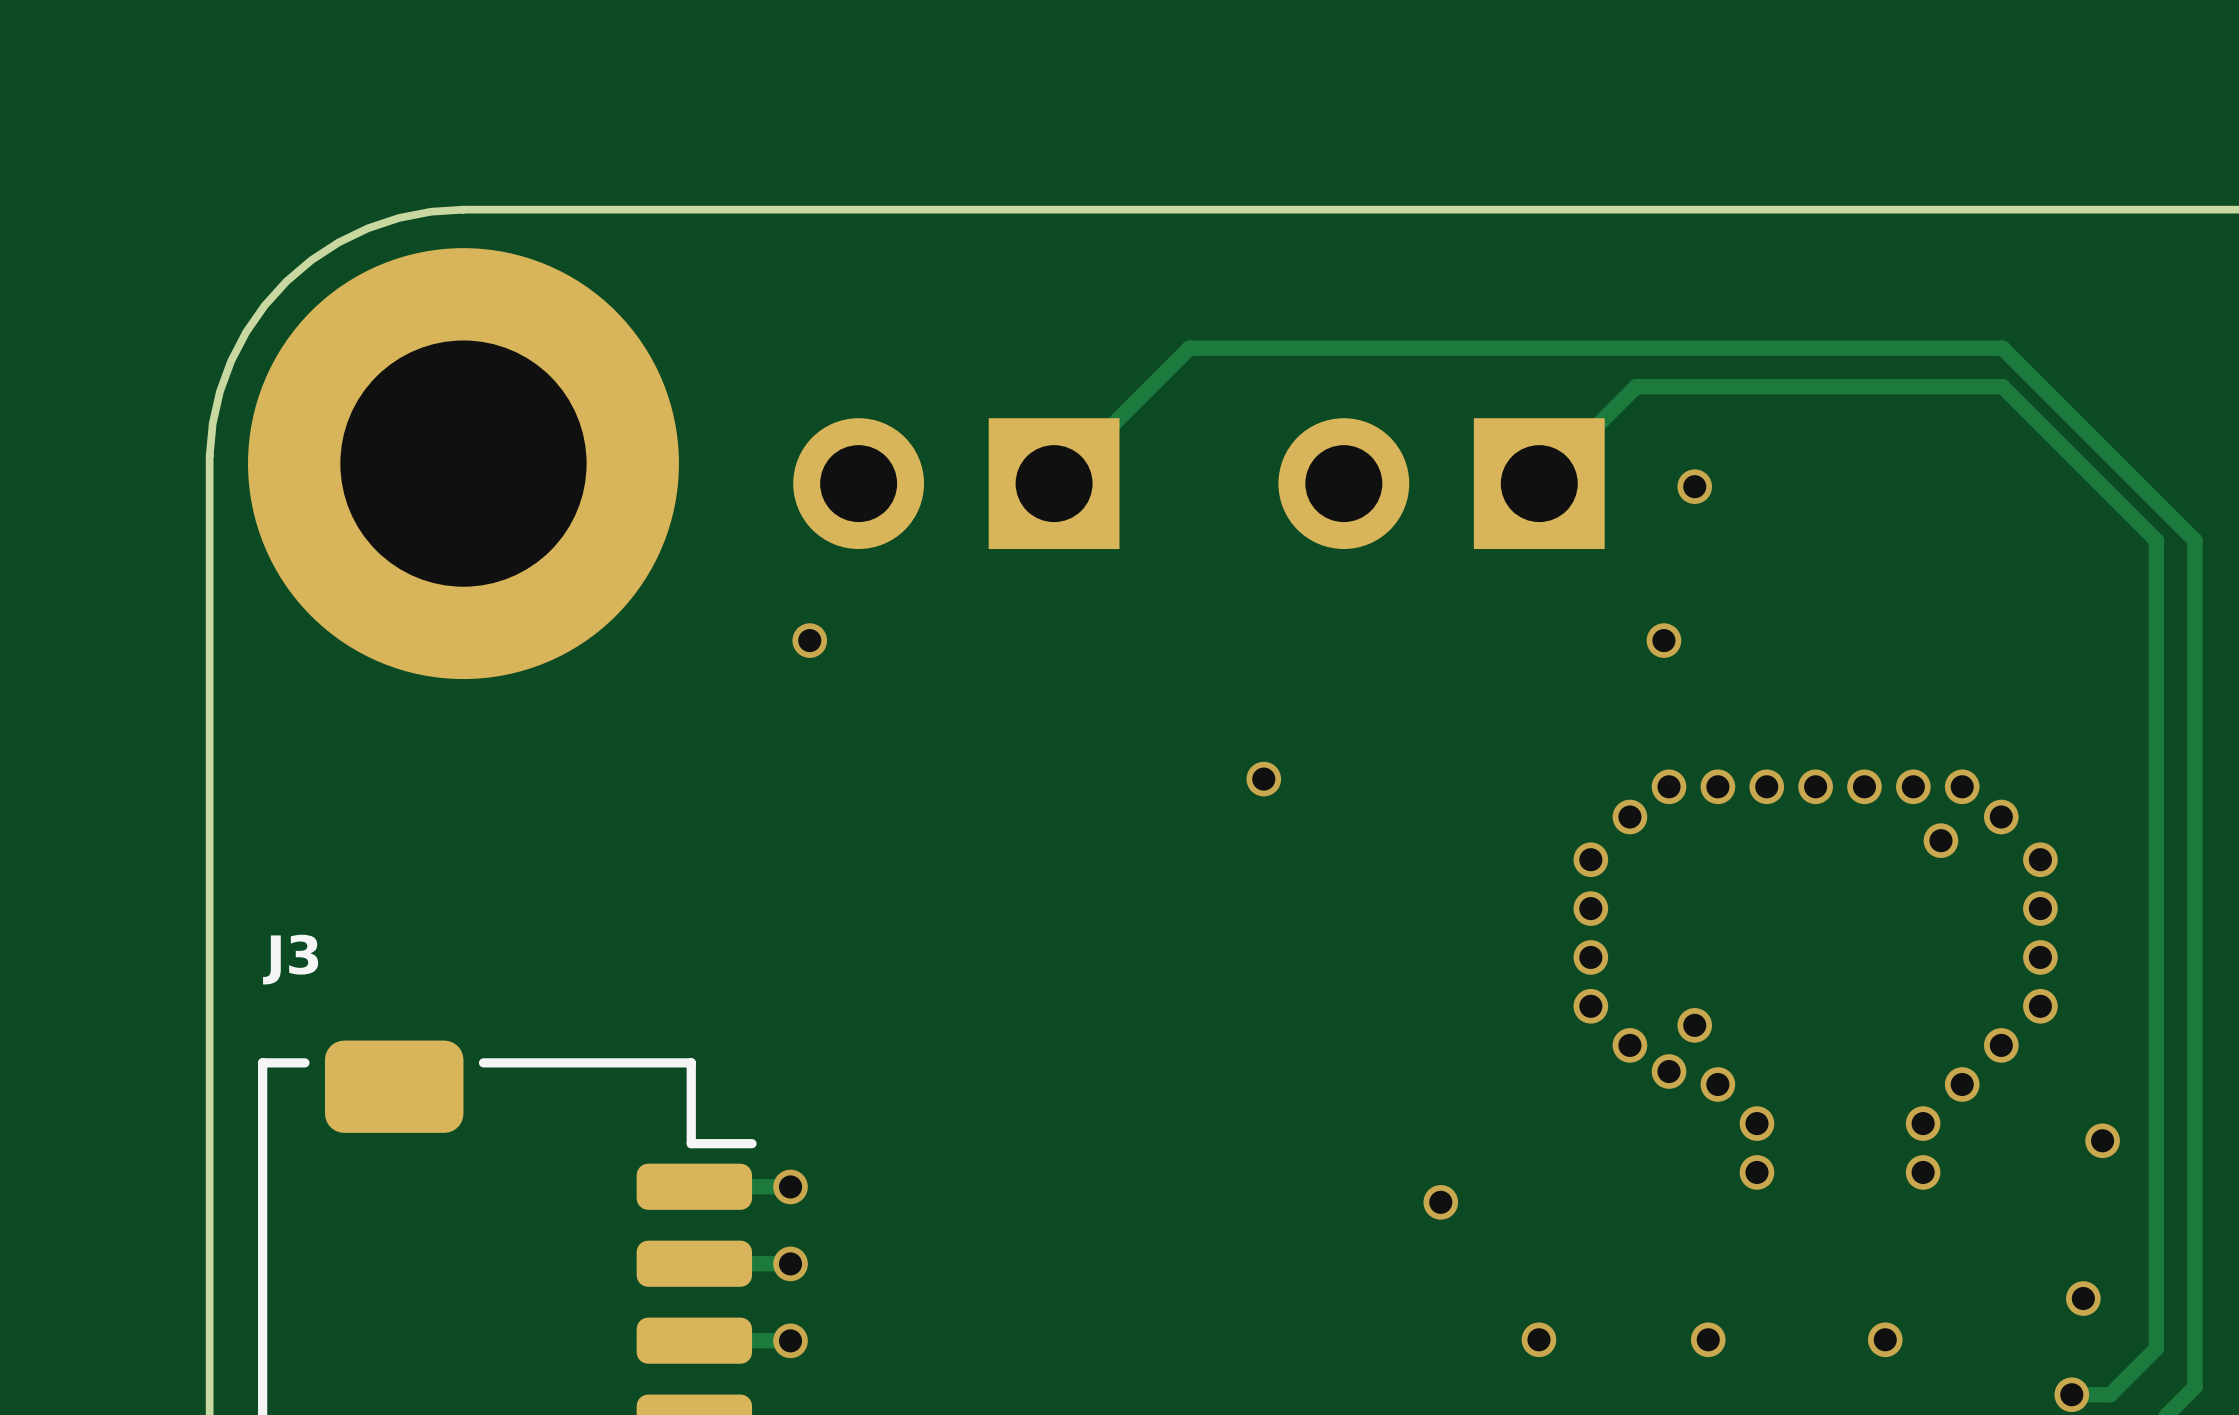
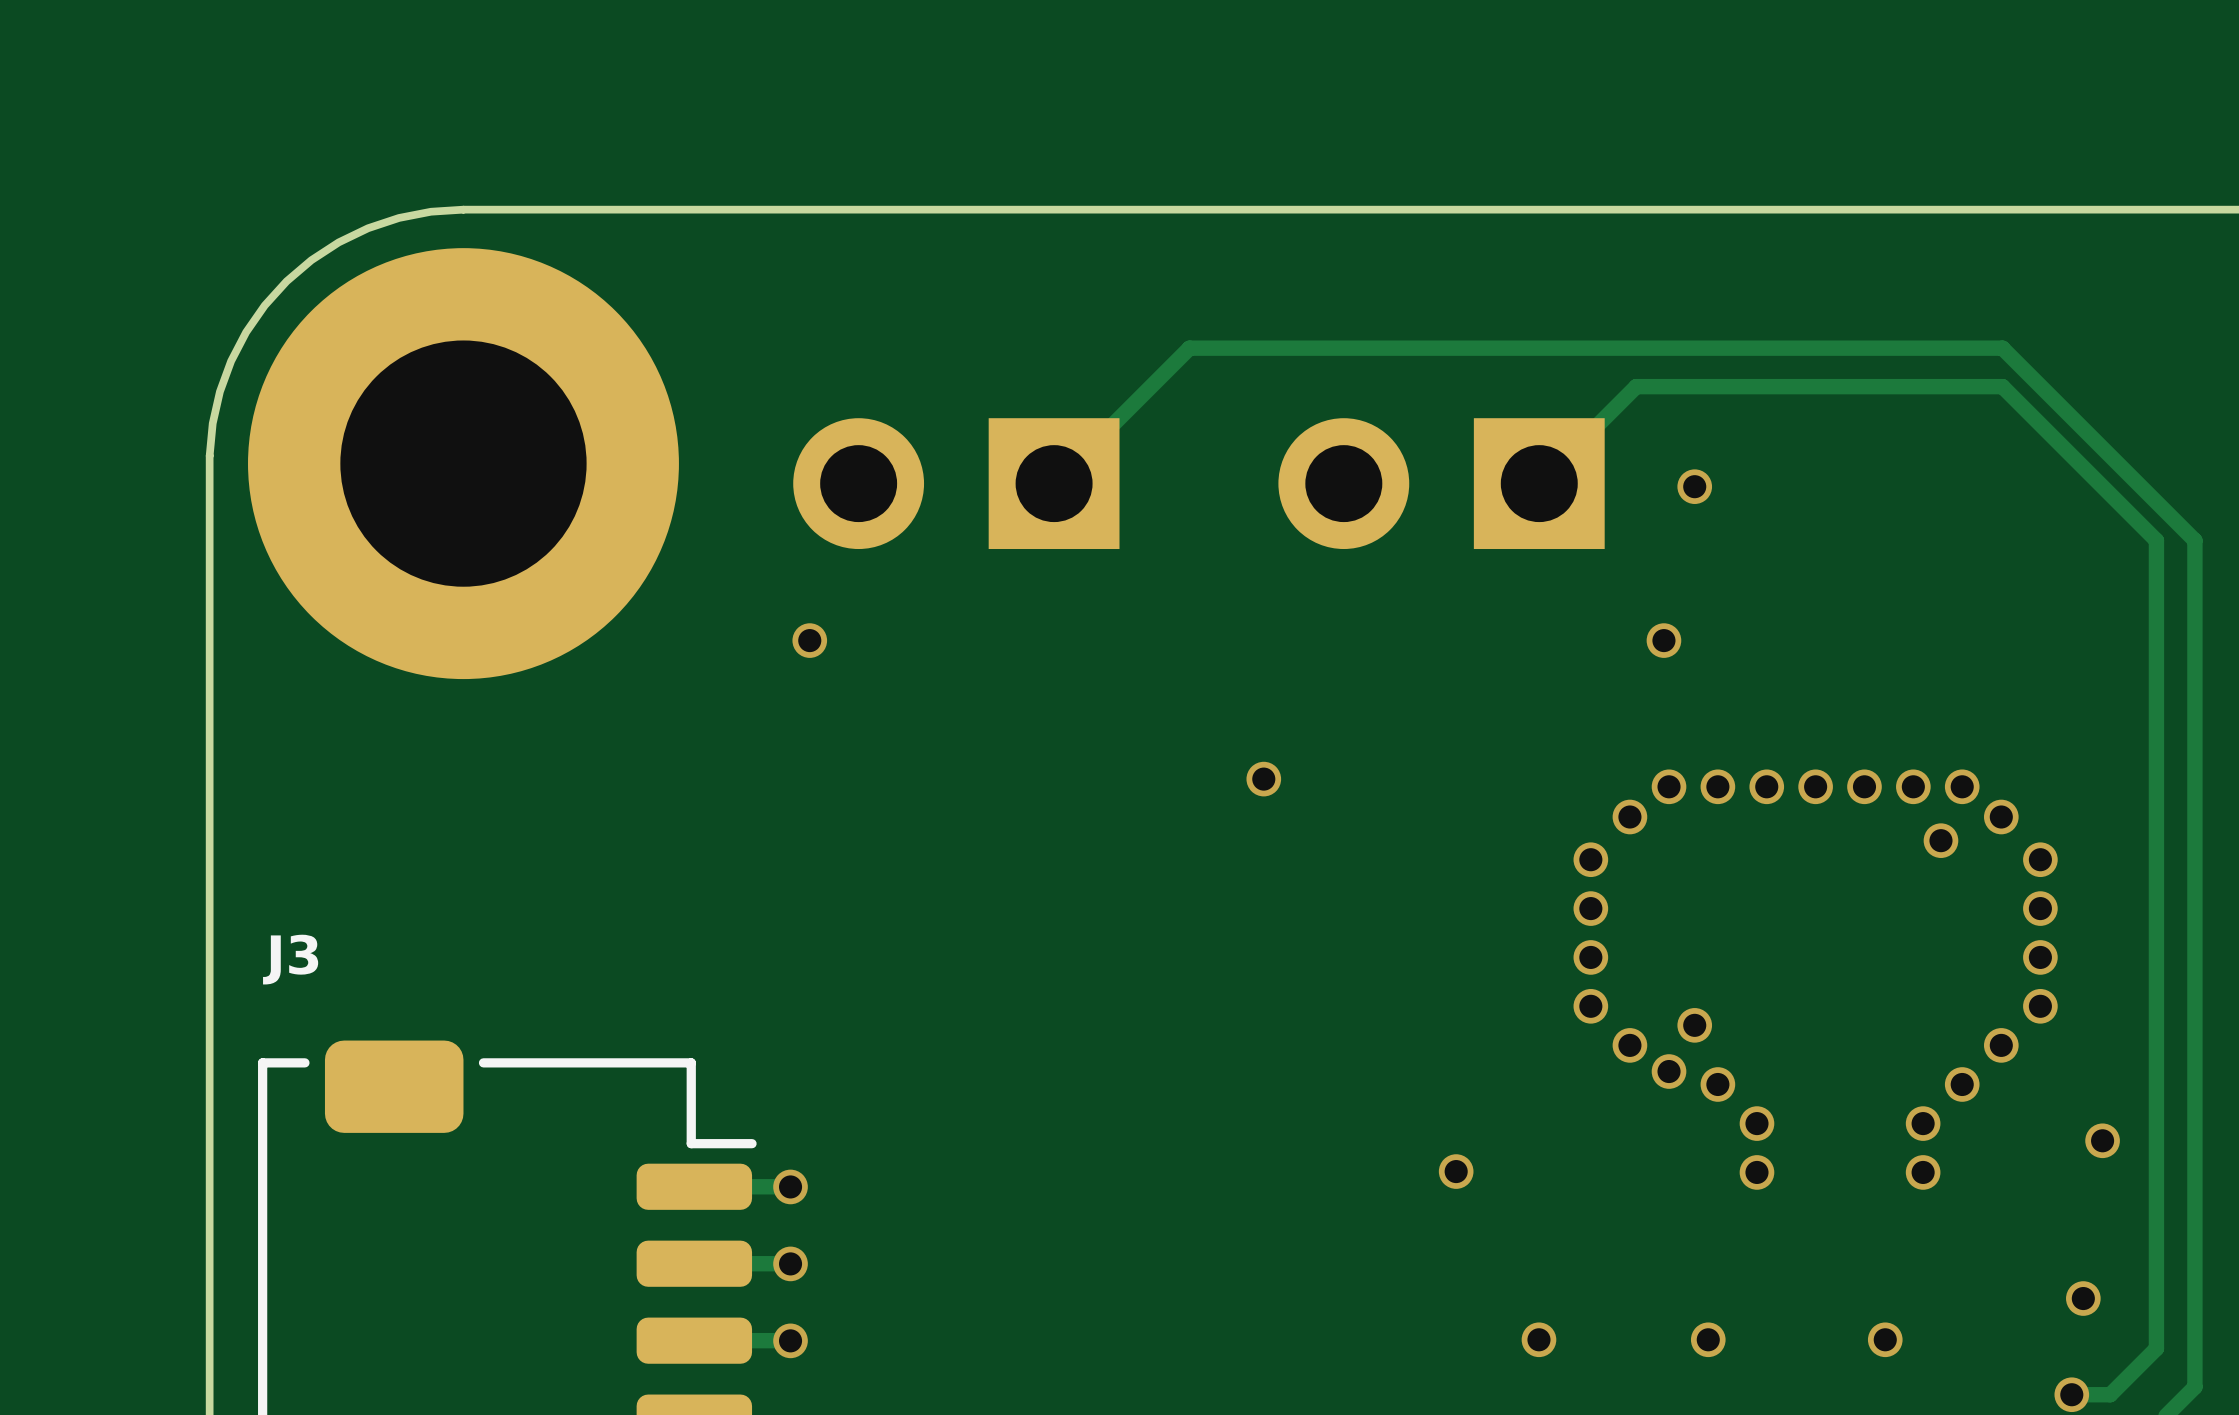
via position: (1440, 1202) -> (1456, 1171)

